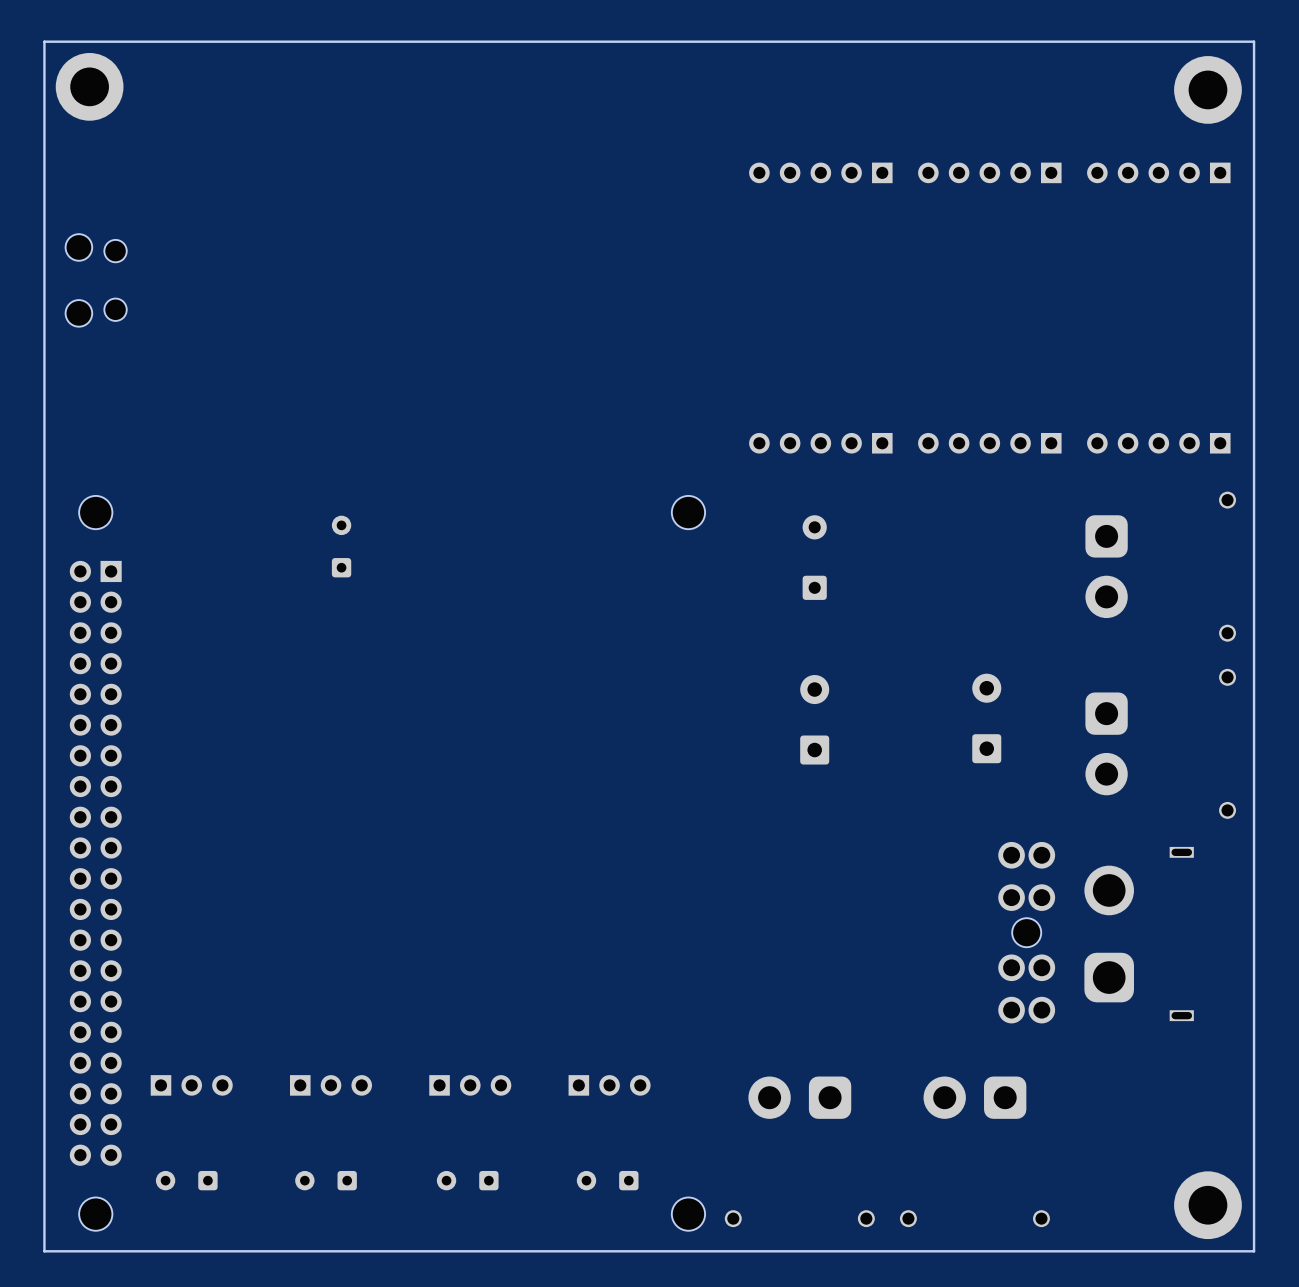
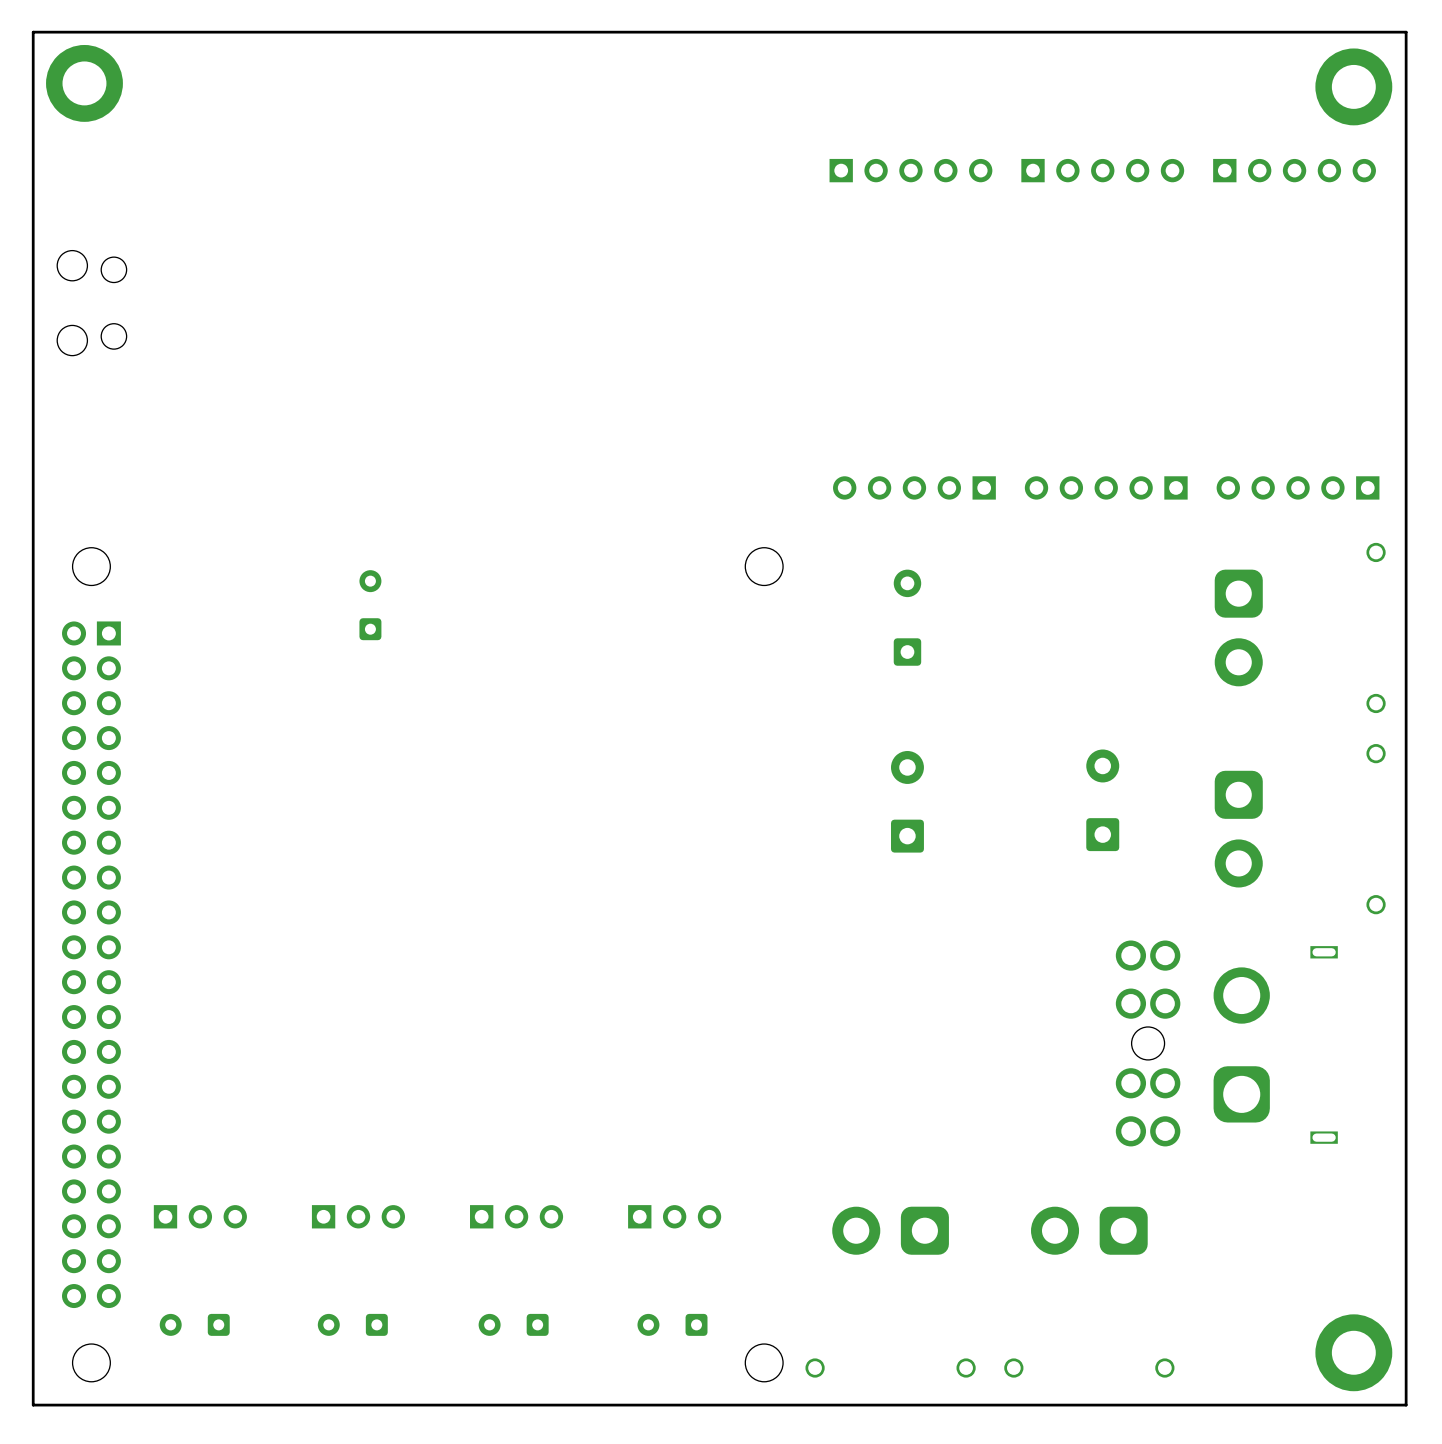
part rotation: 0° (820, 172) -> 180° (910, 170)
part rotation: 0° (989, 172) -> 180° (1102, 170)
part rotation: 0° (1158, 172) -> 180° (1294, 170)

